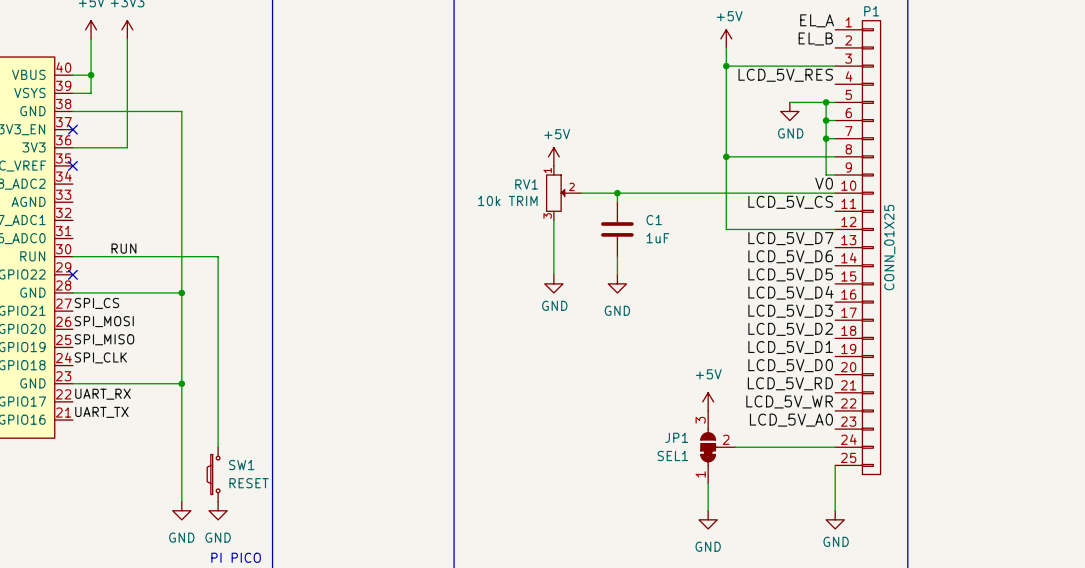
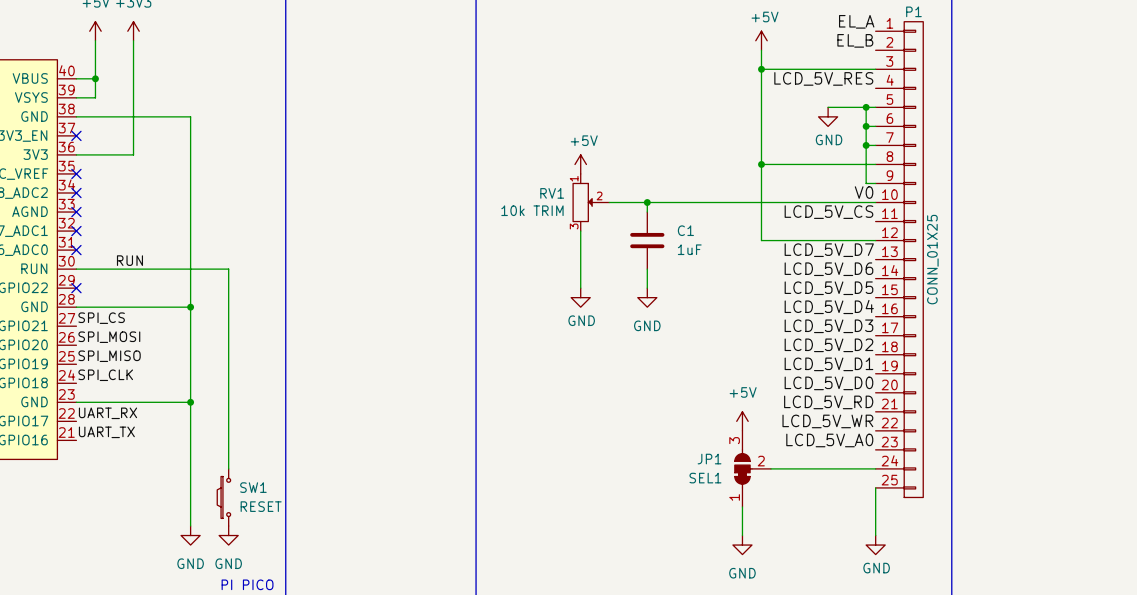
no-connect mark: none -> (76, 192)
no-connect mark: none -> (76, 212)
no-connect mark: none -> (76, 231)
no-connect mark: none -> (76, 250)

